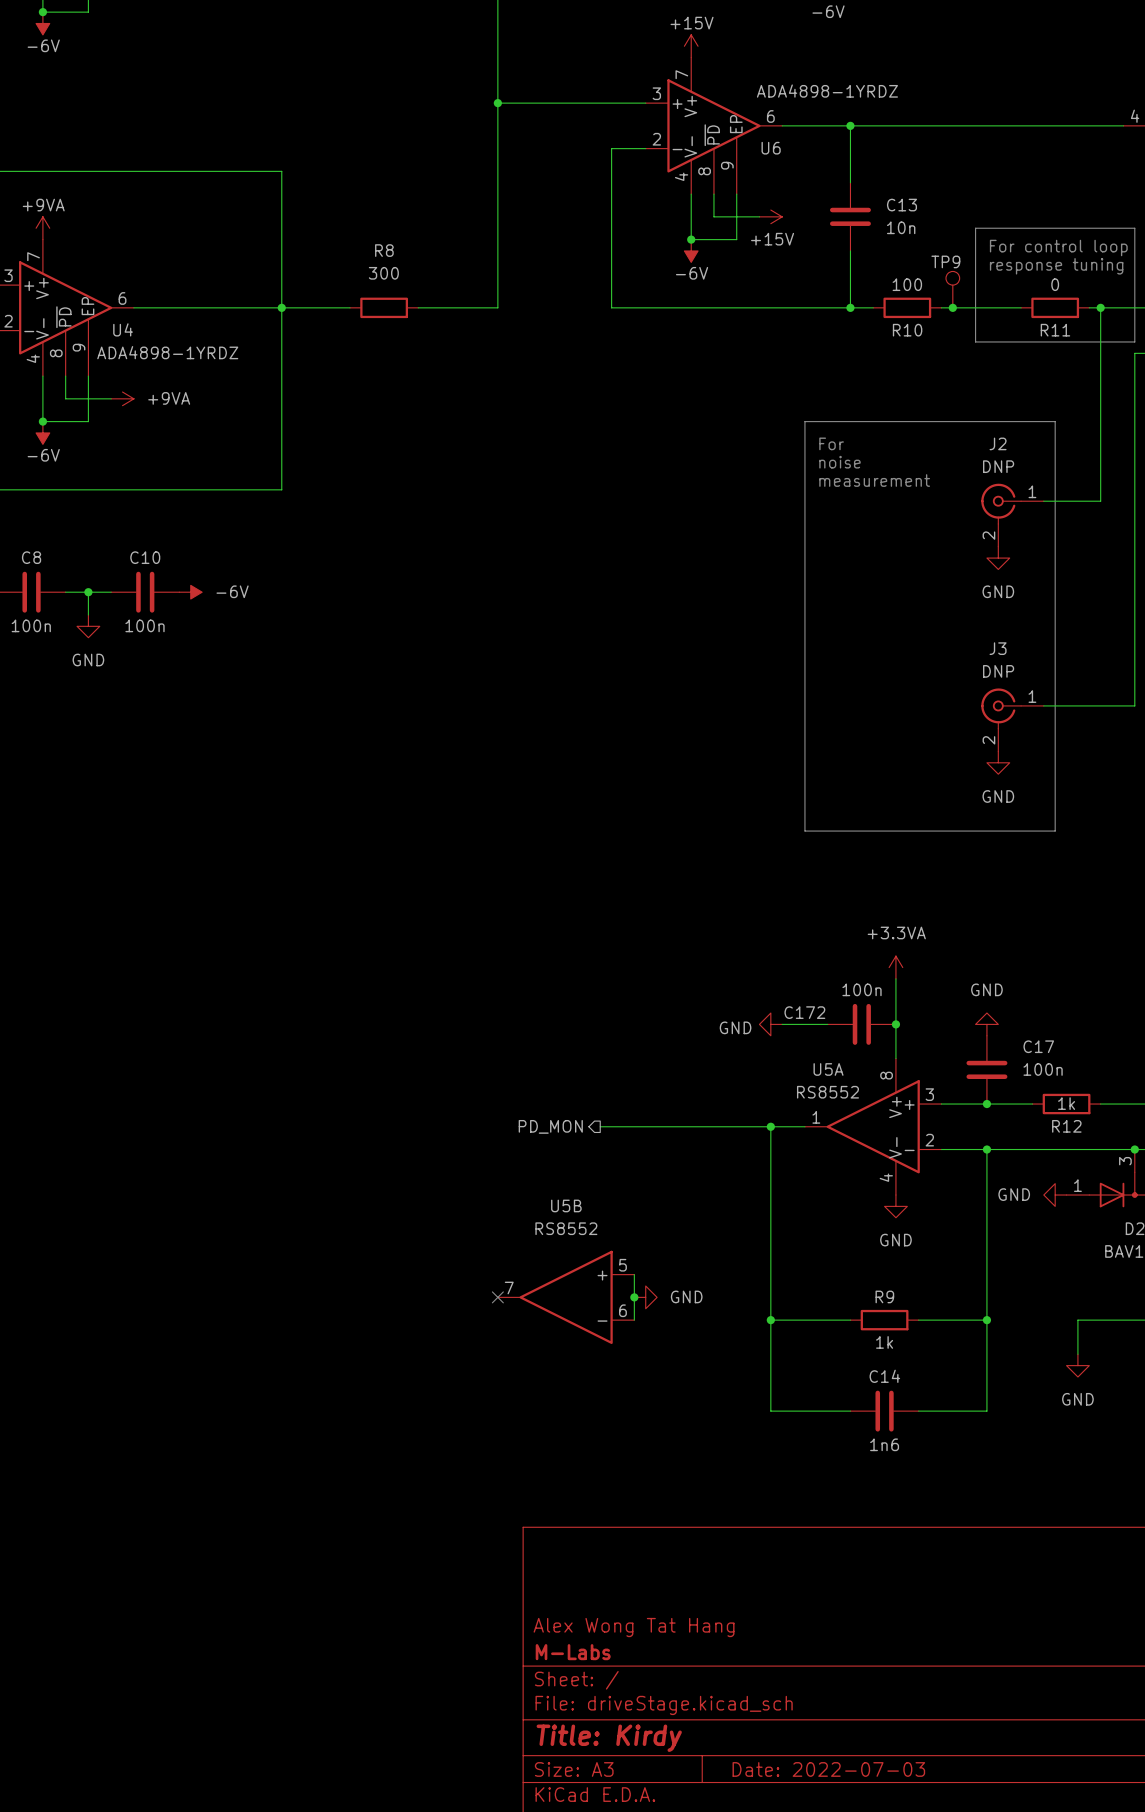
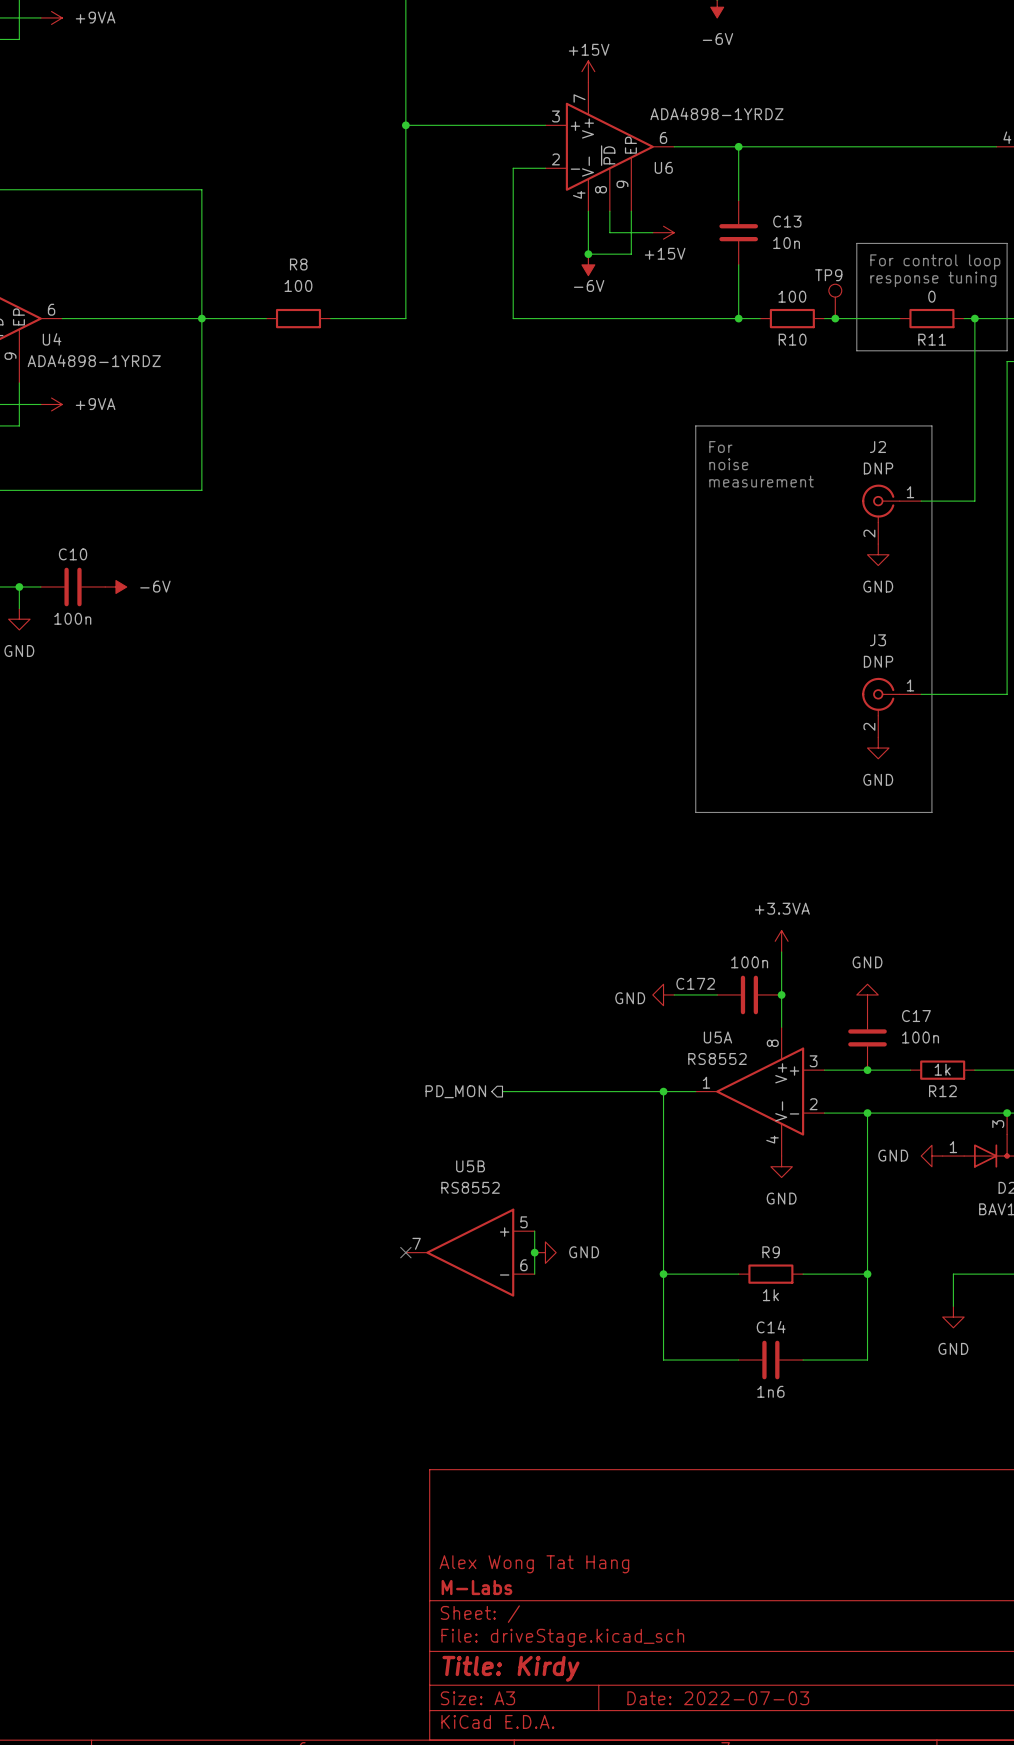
R8 value: 300 (383, 273) -> 100 (298, 285)

